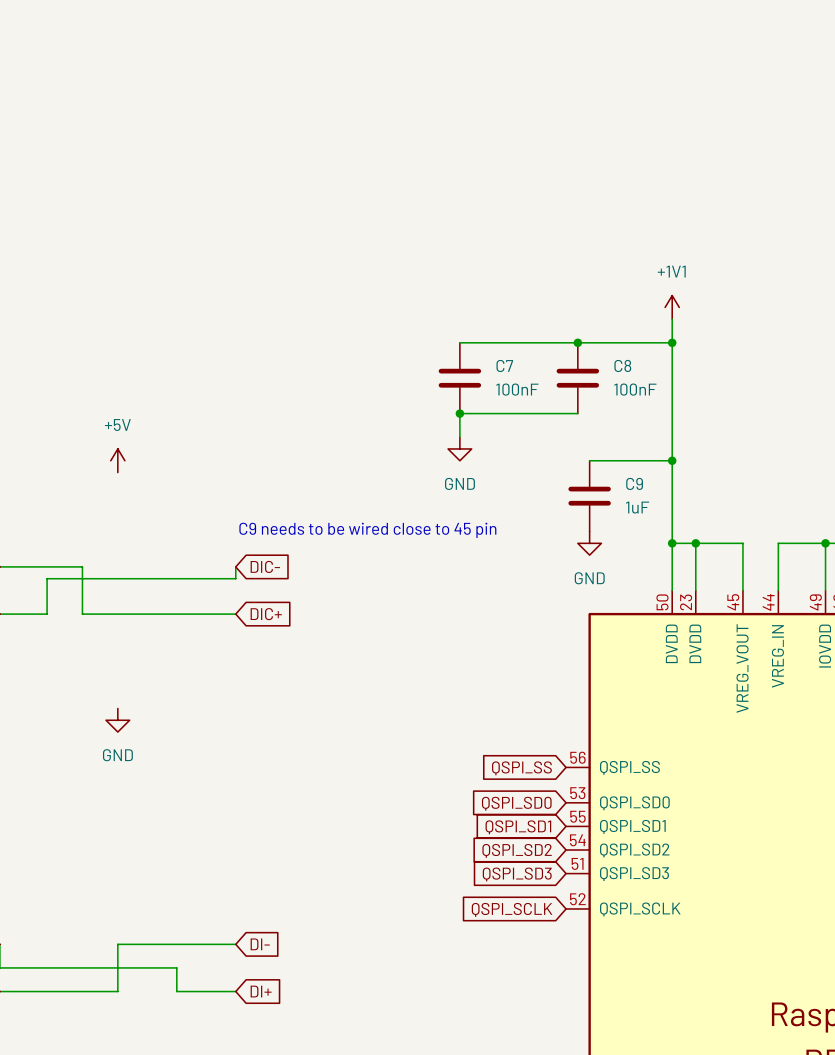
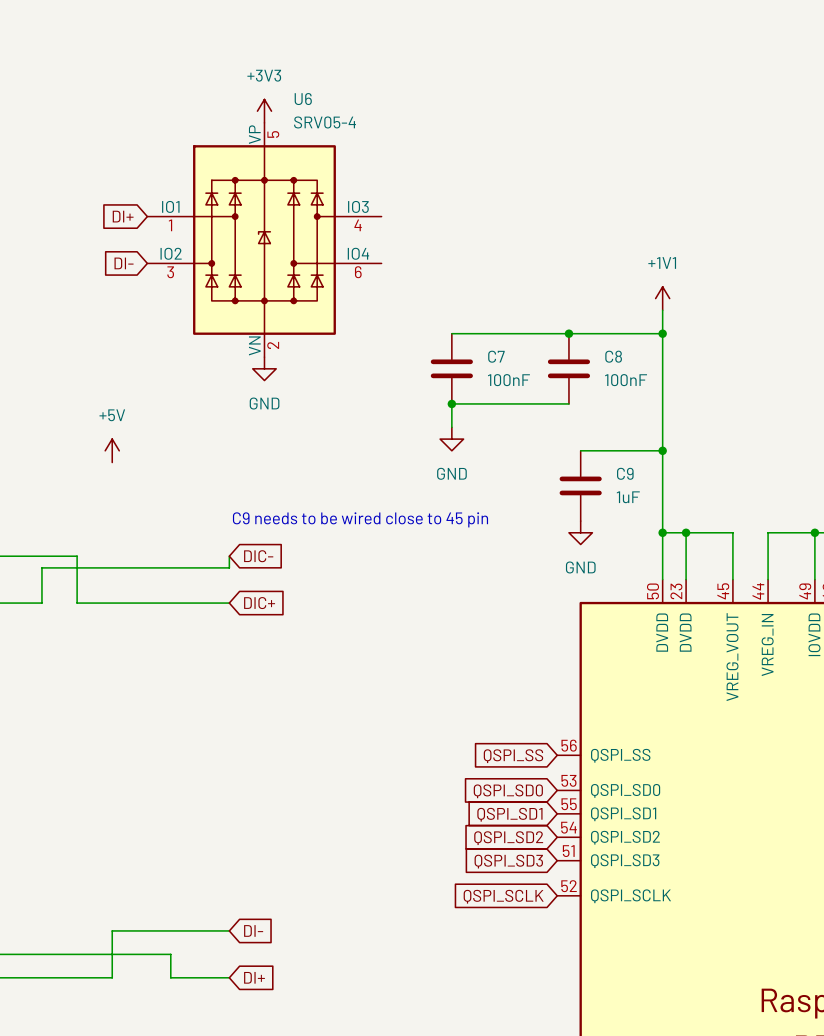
power symbol: none -> +3V3 (264, 111)
global label: none -> DI+ (123, 216)
U6: none -> SRV05-4 (264, 240)
global label: none -> DI- (124, 263)
power symbol: none -> GND (264, 368)
power symbol: GND (117, 720) -> none

